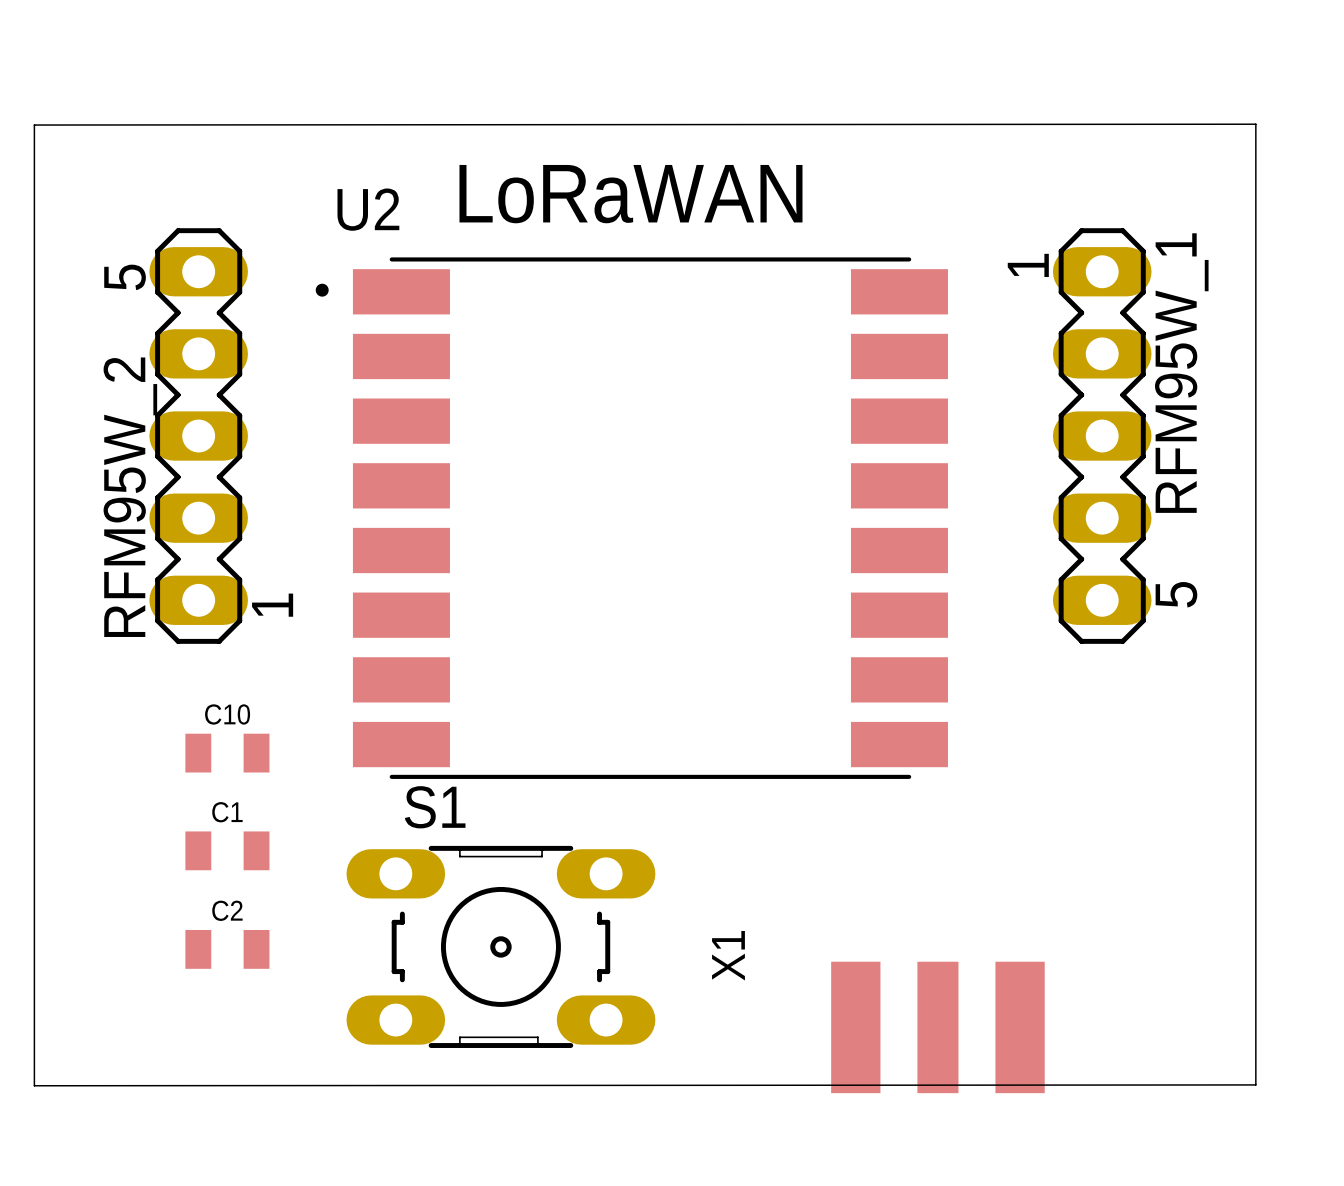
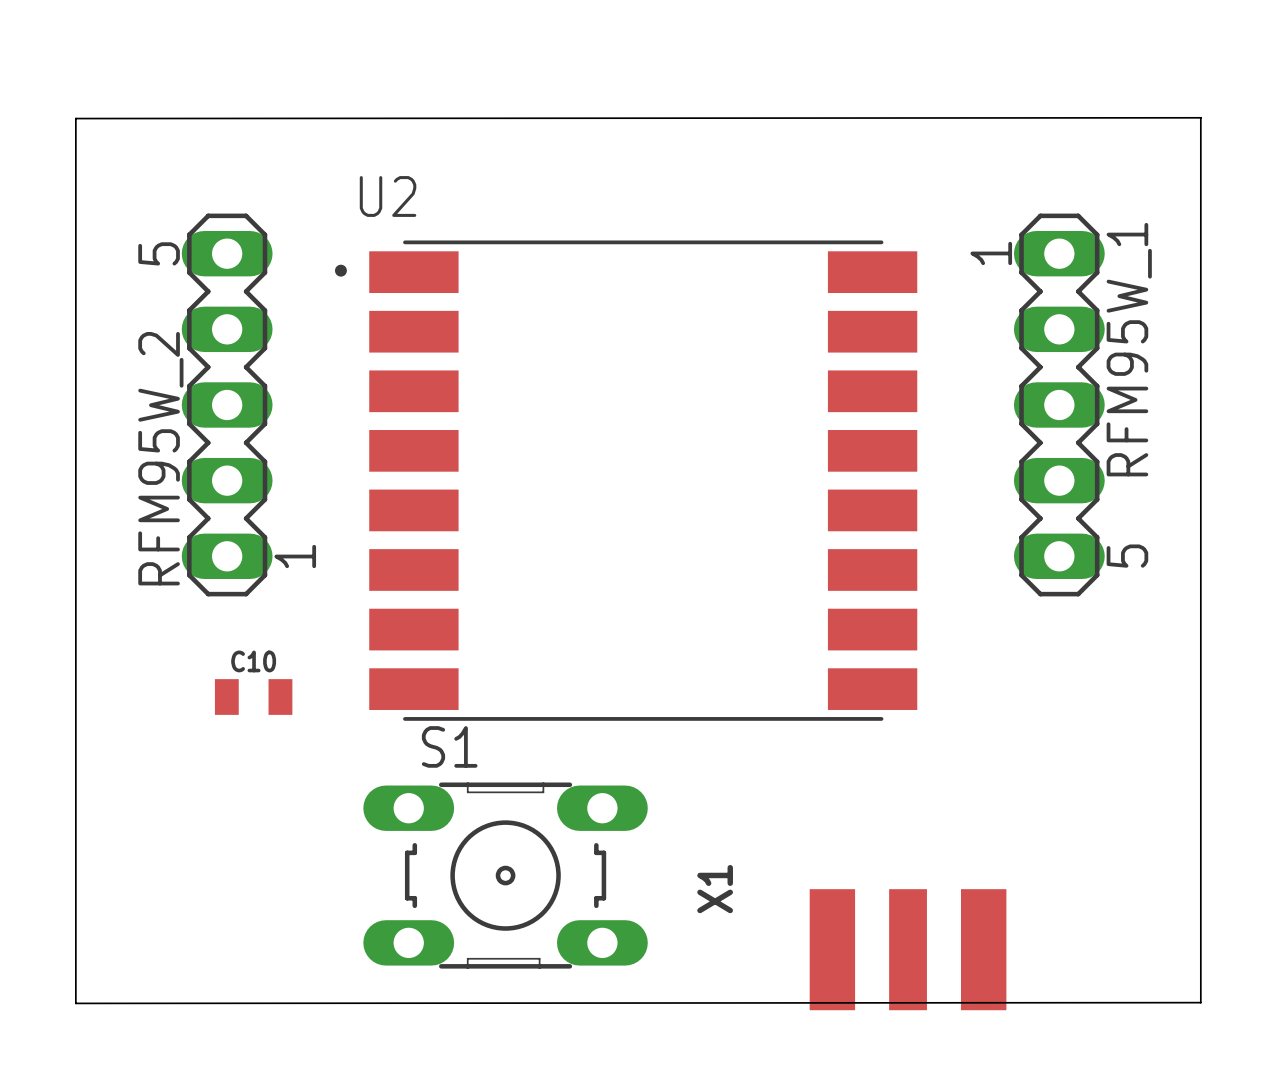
text: LoRaWAN (630, 194) -> none
C1: (227, 850) -> none
C2: (227, 949) -> none

